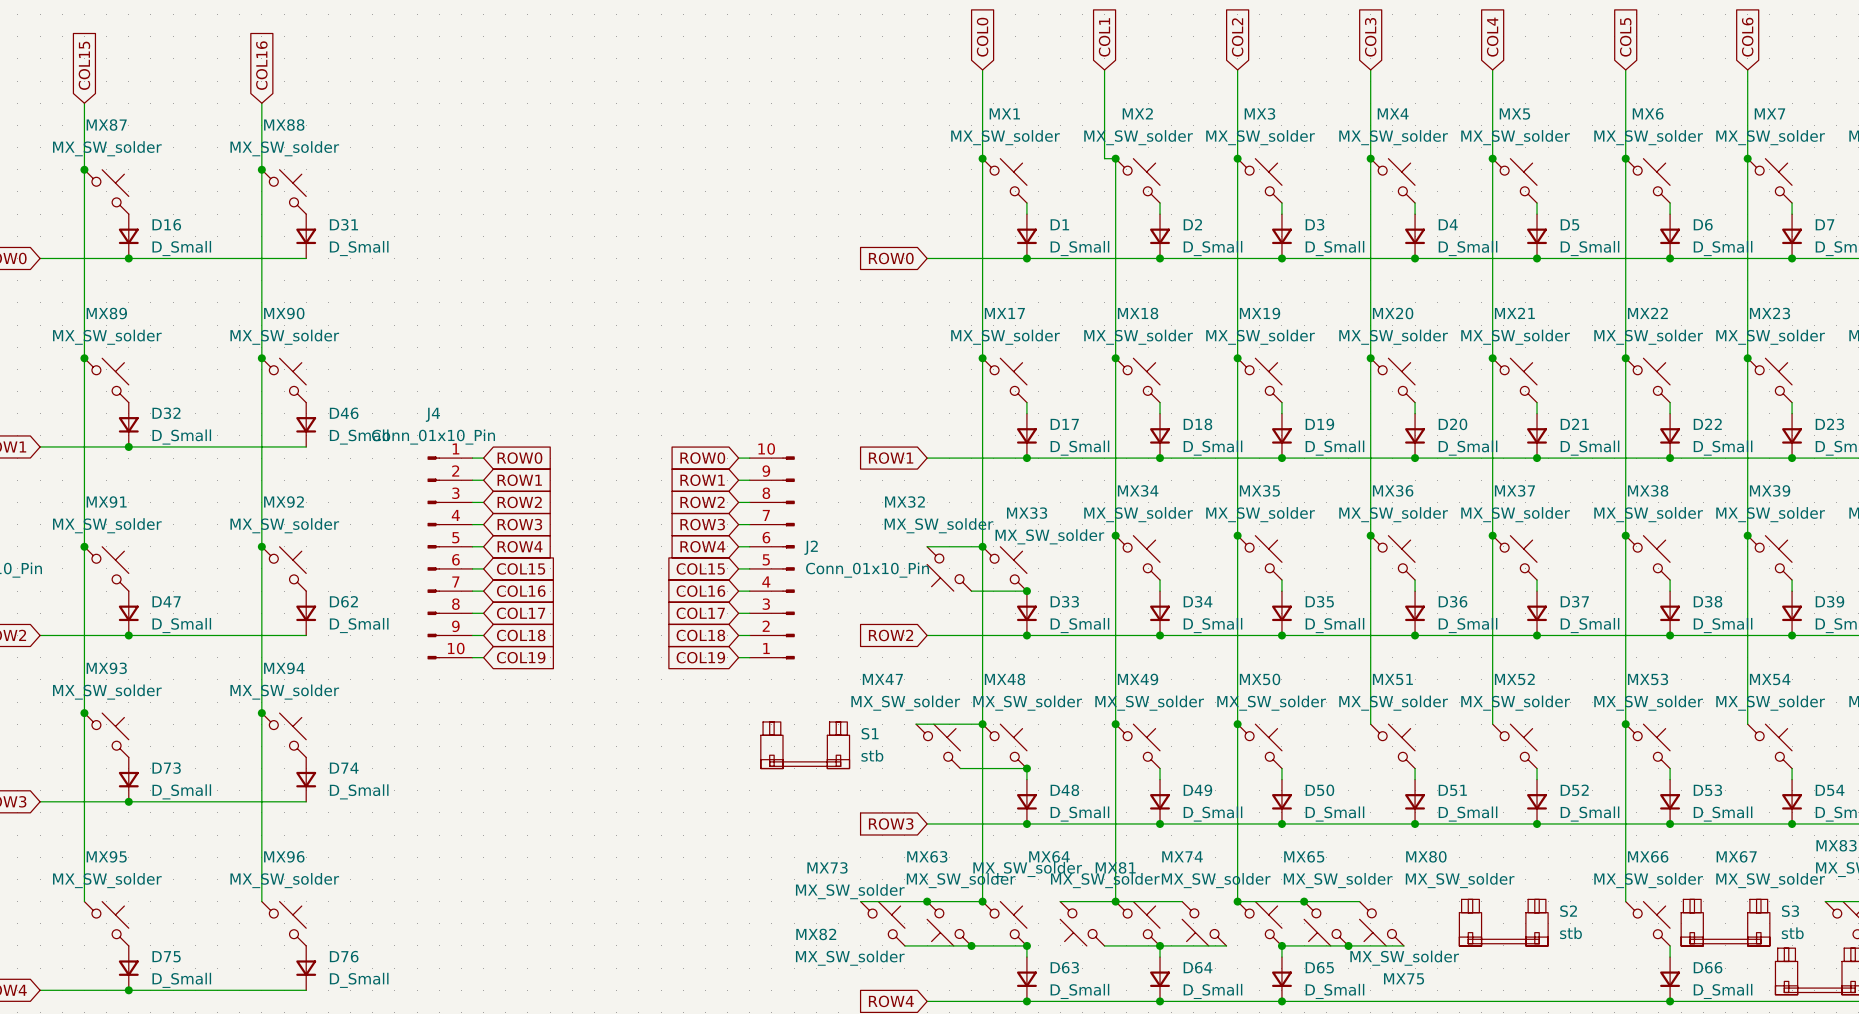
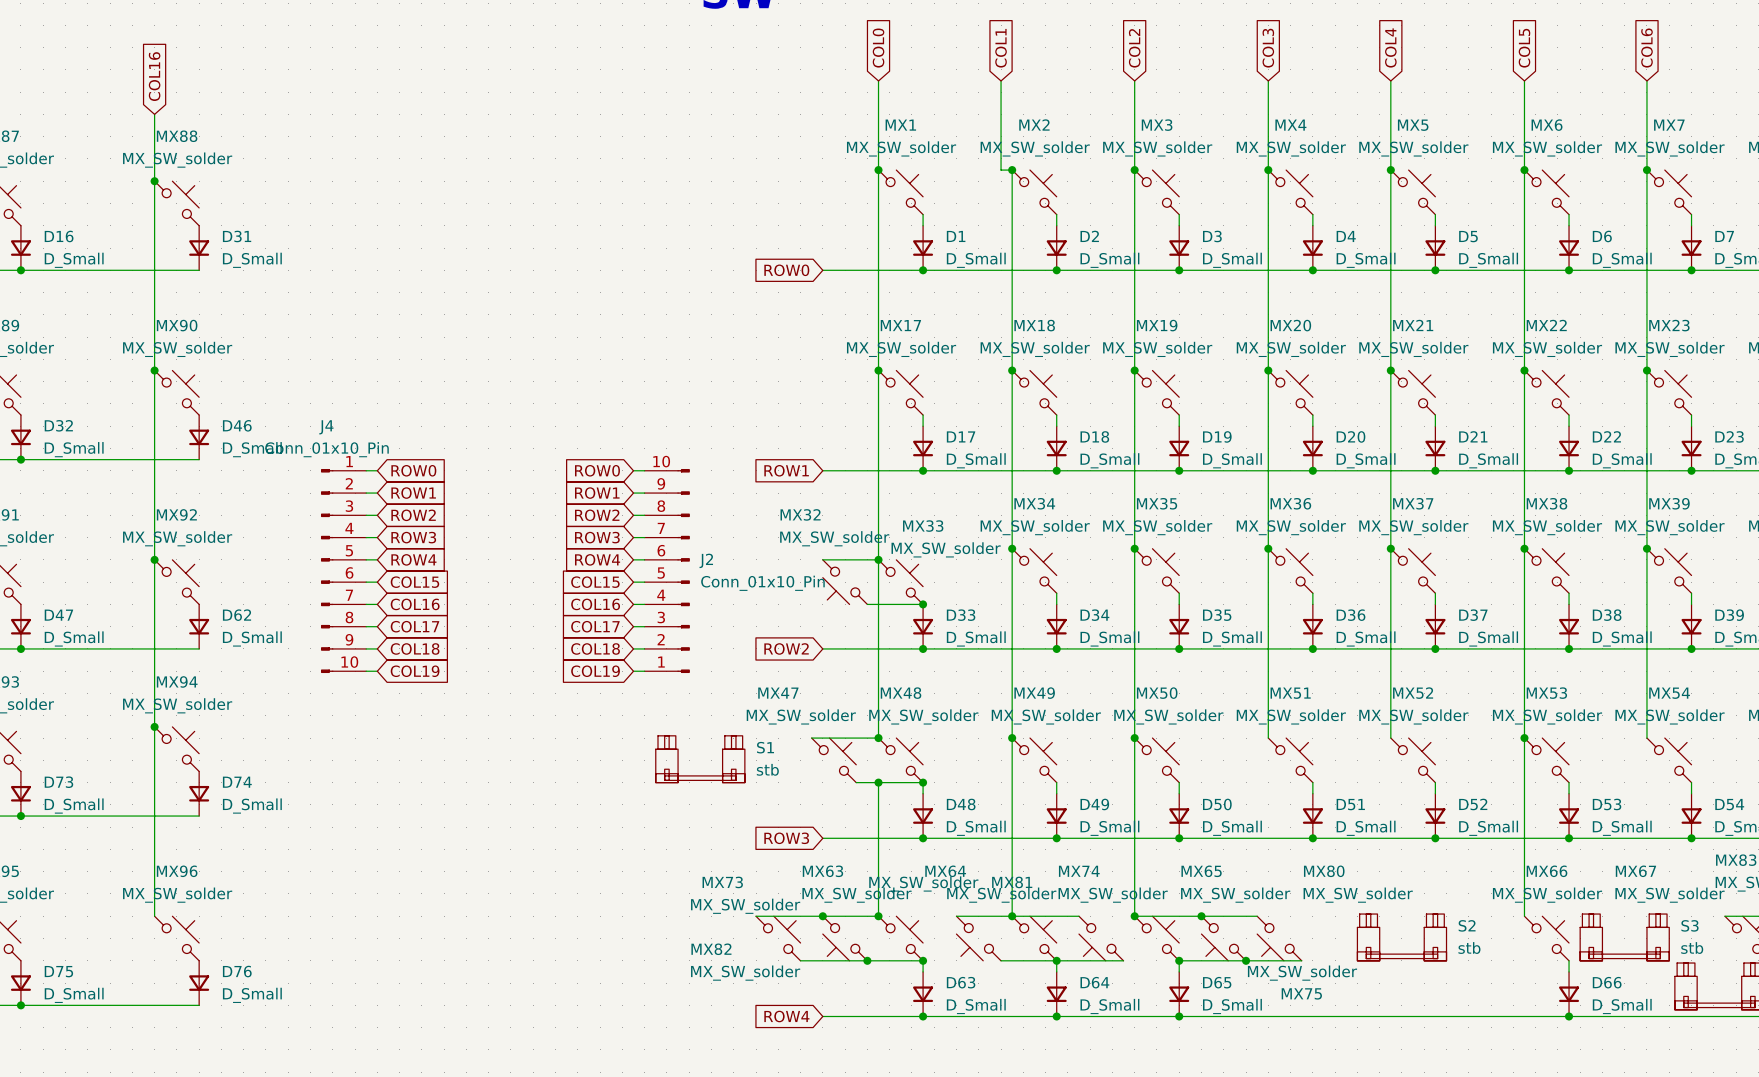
wire: (982, 724) (982, 768) -> none
junction: none -> (878, 782)

